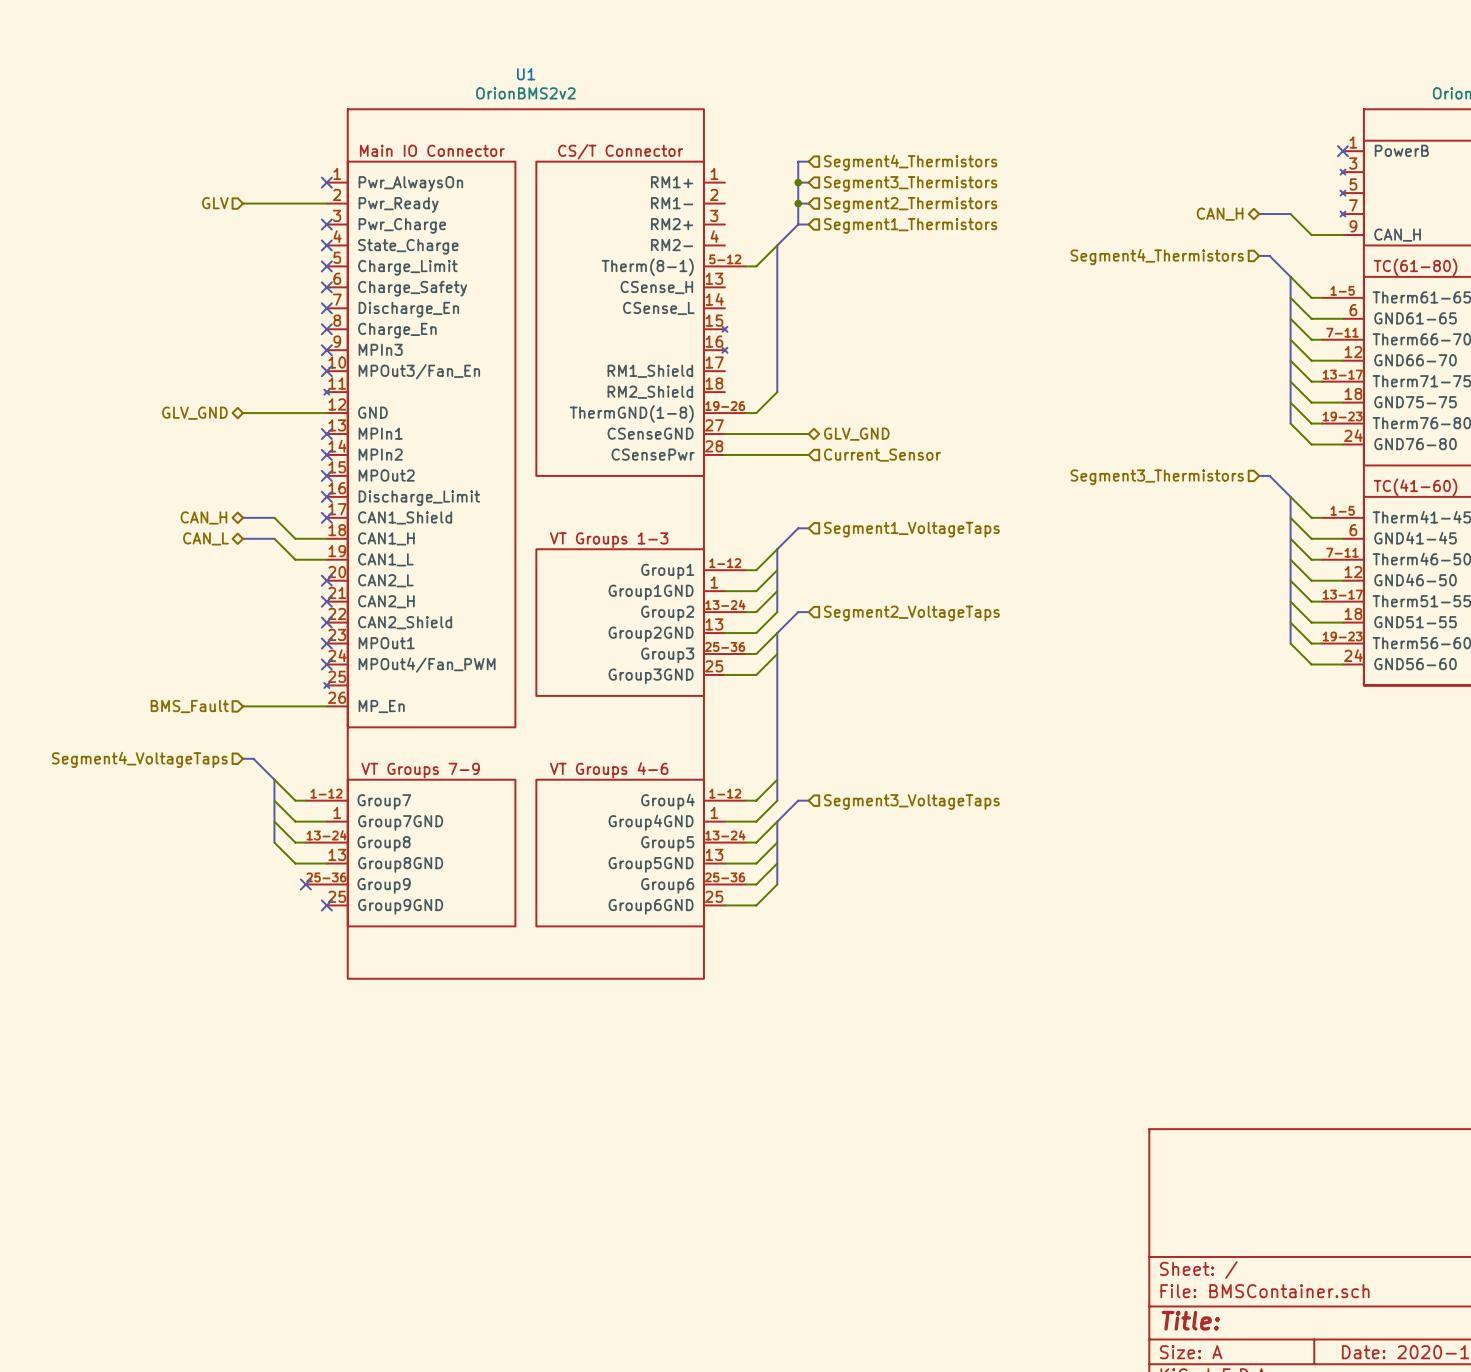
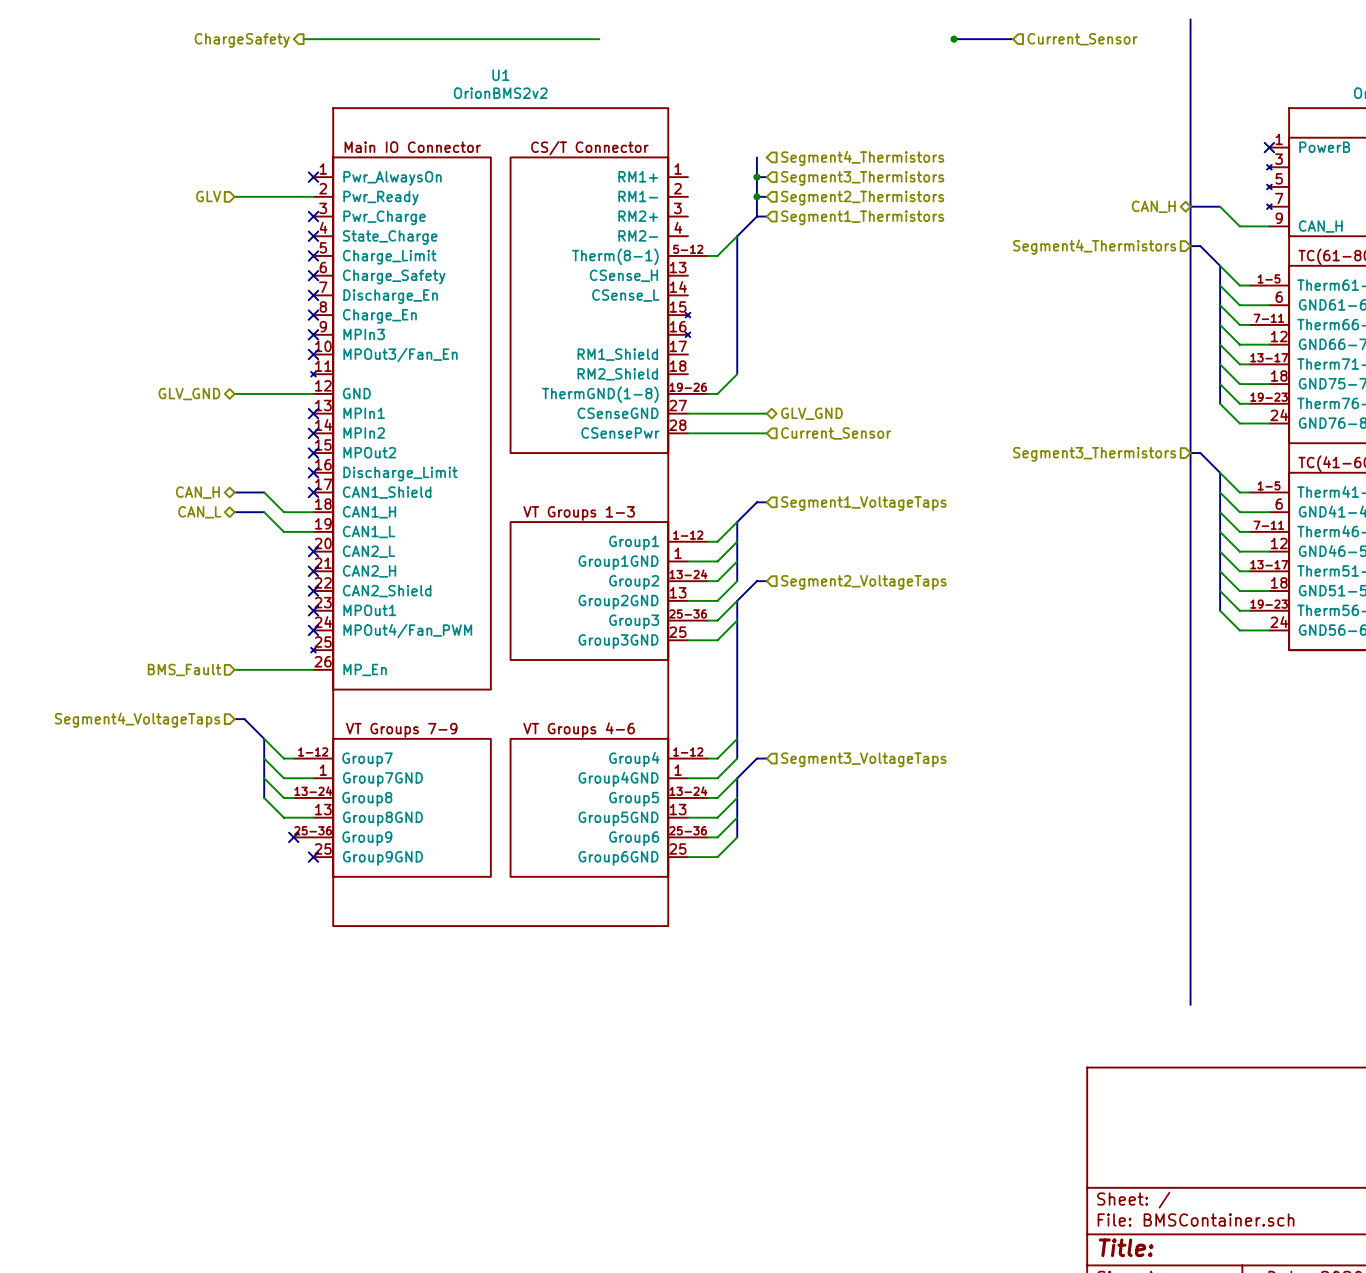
bus: none -> (1190, 19) (1190, 1004)
wire: none -> (303, 39) (599, 39)
bus: none -> (954, 39) (1013, 39)
junction: none -> (954, 39)
hierarchical label: none -> Current_Sensor (1082, 39)
hierarchical label: none -> ChargeSafety (242, 40)
bus: (798, 161) (808, 161) -> none

